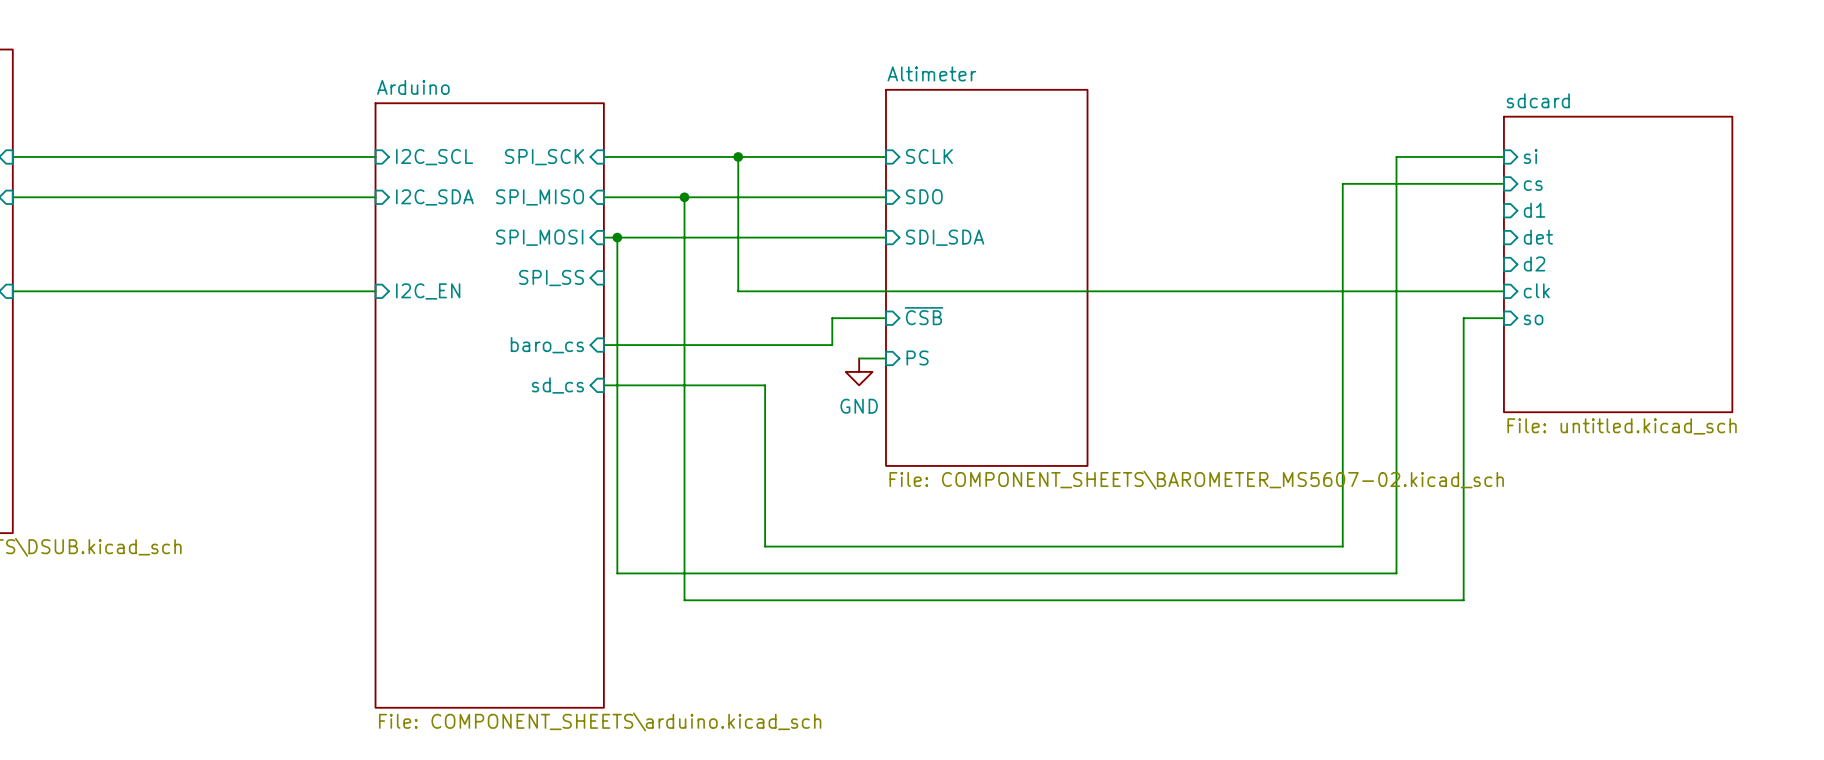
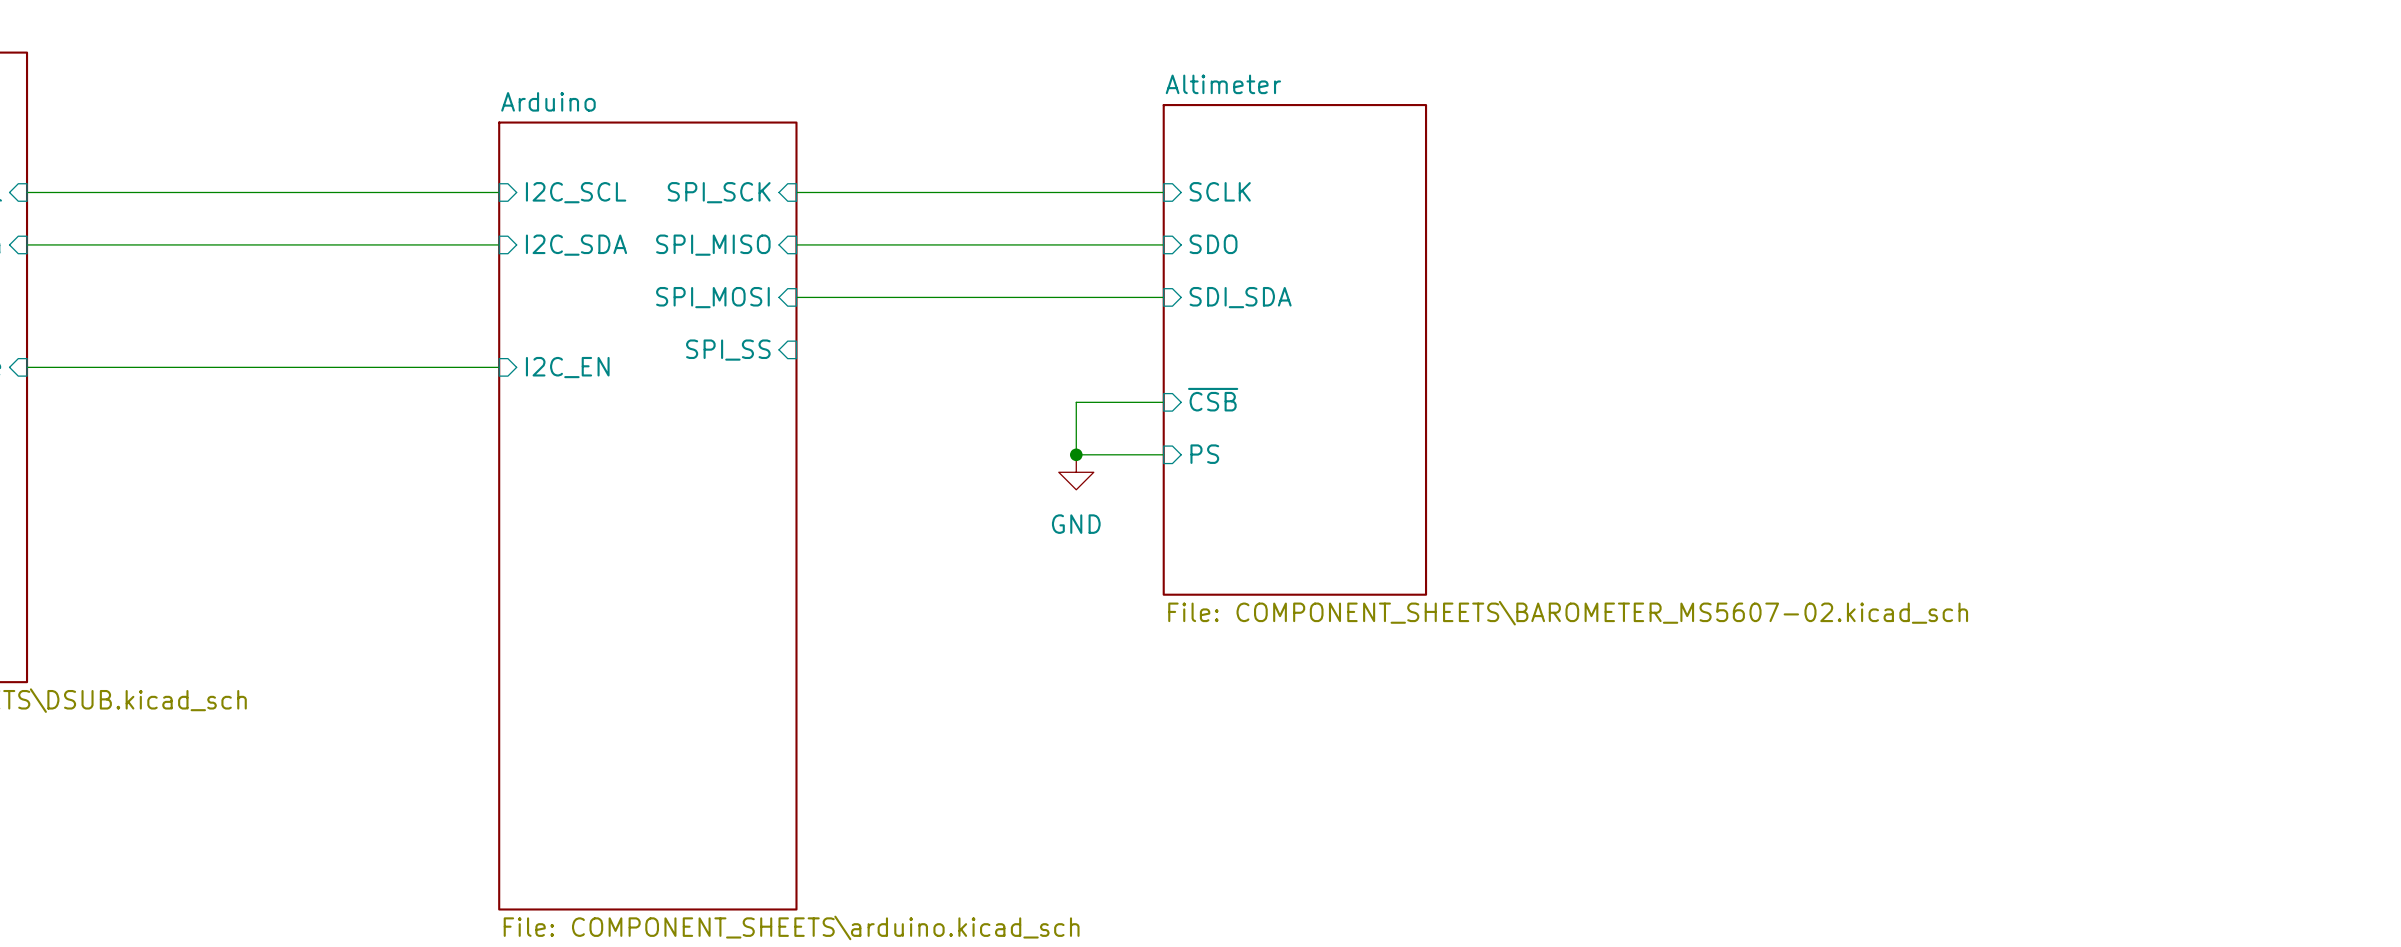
wire: (738, 156) (738, 291) (1503, 291) -> none
junction: (738, 156) -> none
wire: (1503, 156) (1396, 156) (1396, 573) (617, 573) (617, 237) -> none
sheet pin: si (1530, 156) -> none
wire: (1503, 183) (1342, 183) (1342, 546) (765, 546) (765, 385) (603, 385) -> none
sheet pin: cs (1533, 185) -> none
wire: (684, 197) (684, 600) (1463, 600) (1463, 318) (1503, 318) -> none
junction: (684, 197) -> none
sheet pin: d1 (1534, 210) -> none
junction: (617, 237) -> none
sheet pin: det (1538, 237) -> none
sheet pin: d2 (1534, 263) -> none
sheet sdcard: File: untitled.kicad_sch (1618, 264) -> none
sheet pin: clk (1536, 290) -> none
wire: (832, 318) (832, 345) (603, 345) -> (1093, 402) (1076, 402) (1076, 454) (1128, 454)
sheet pin: so (1533, 319) -> none
sheet pin: baro_cs (547, 345) -> none
junction: none -> (1076, 454)
power symbol position: GND (859, 371) -> GND (1076, 472)
sheet pin: sd_cs (557, 385) -> none
power symbol text position: GND (859, 406) -> GND (1076, 524)

